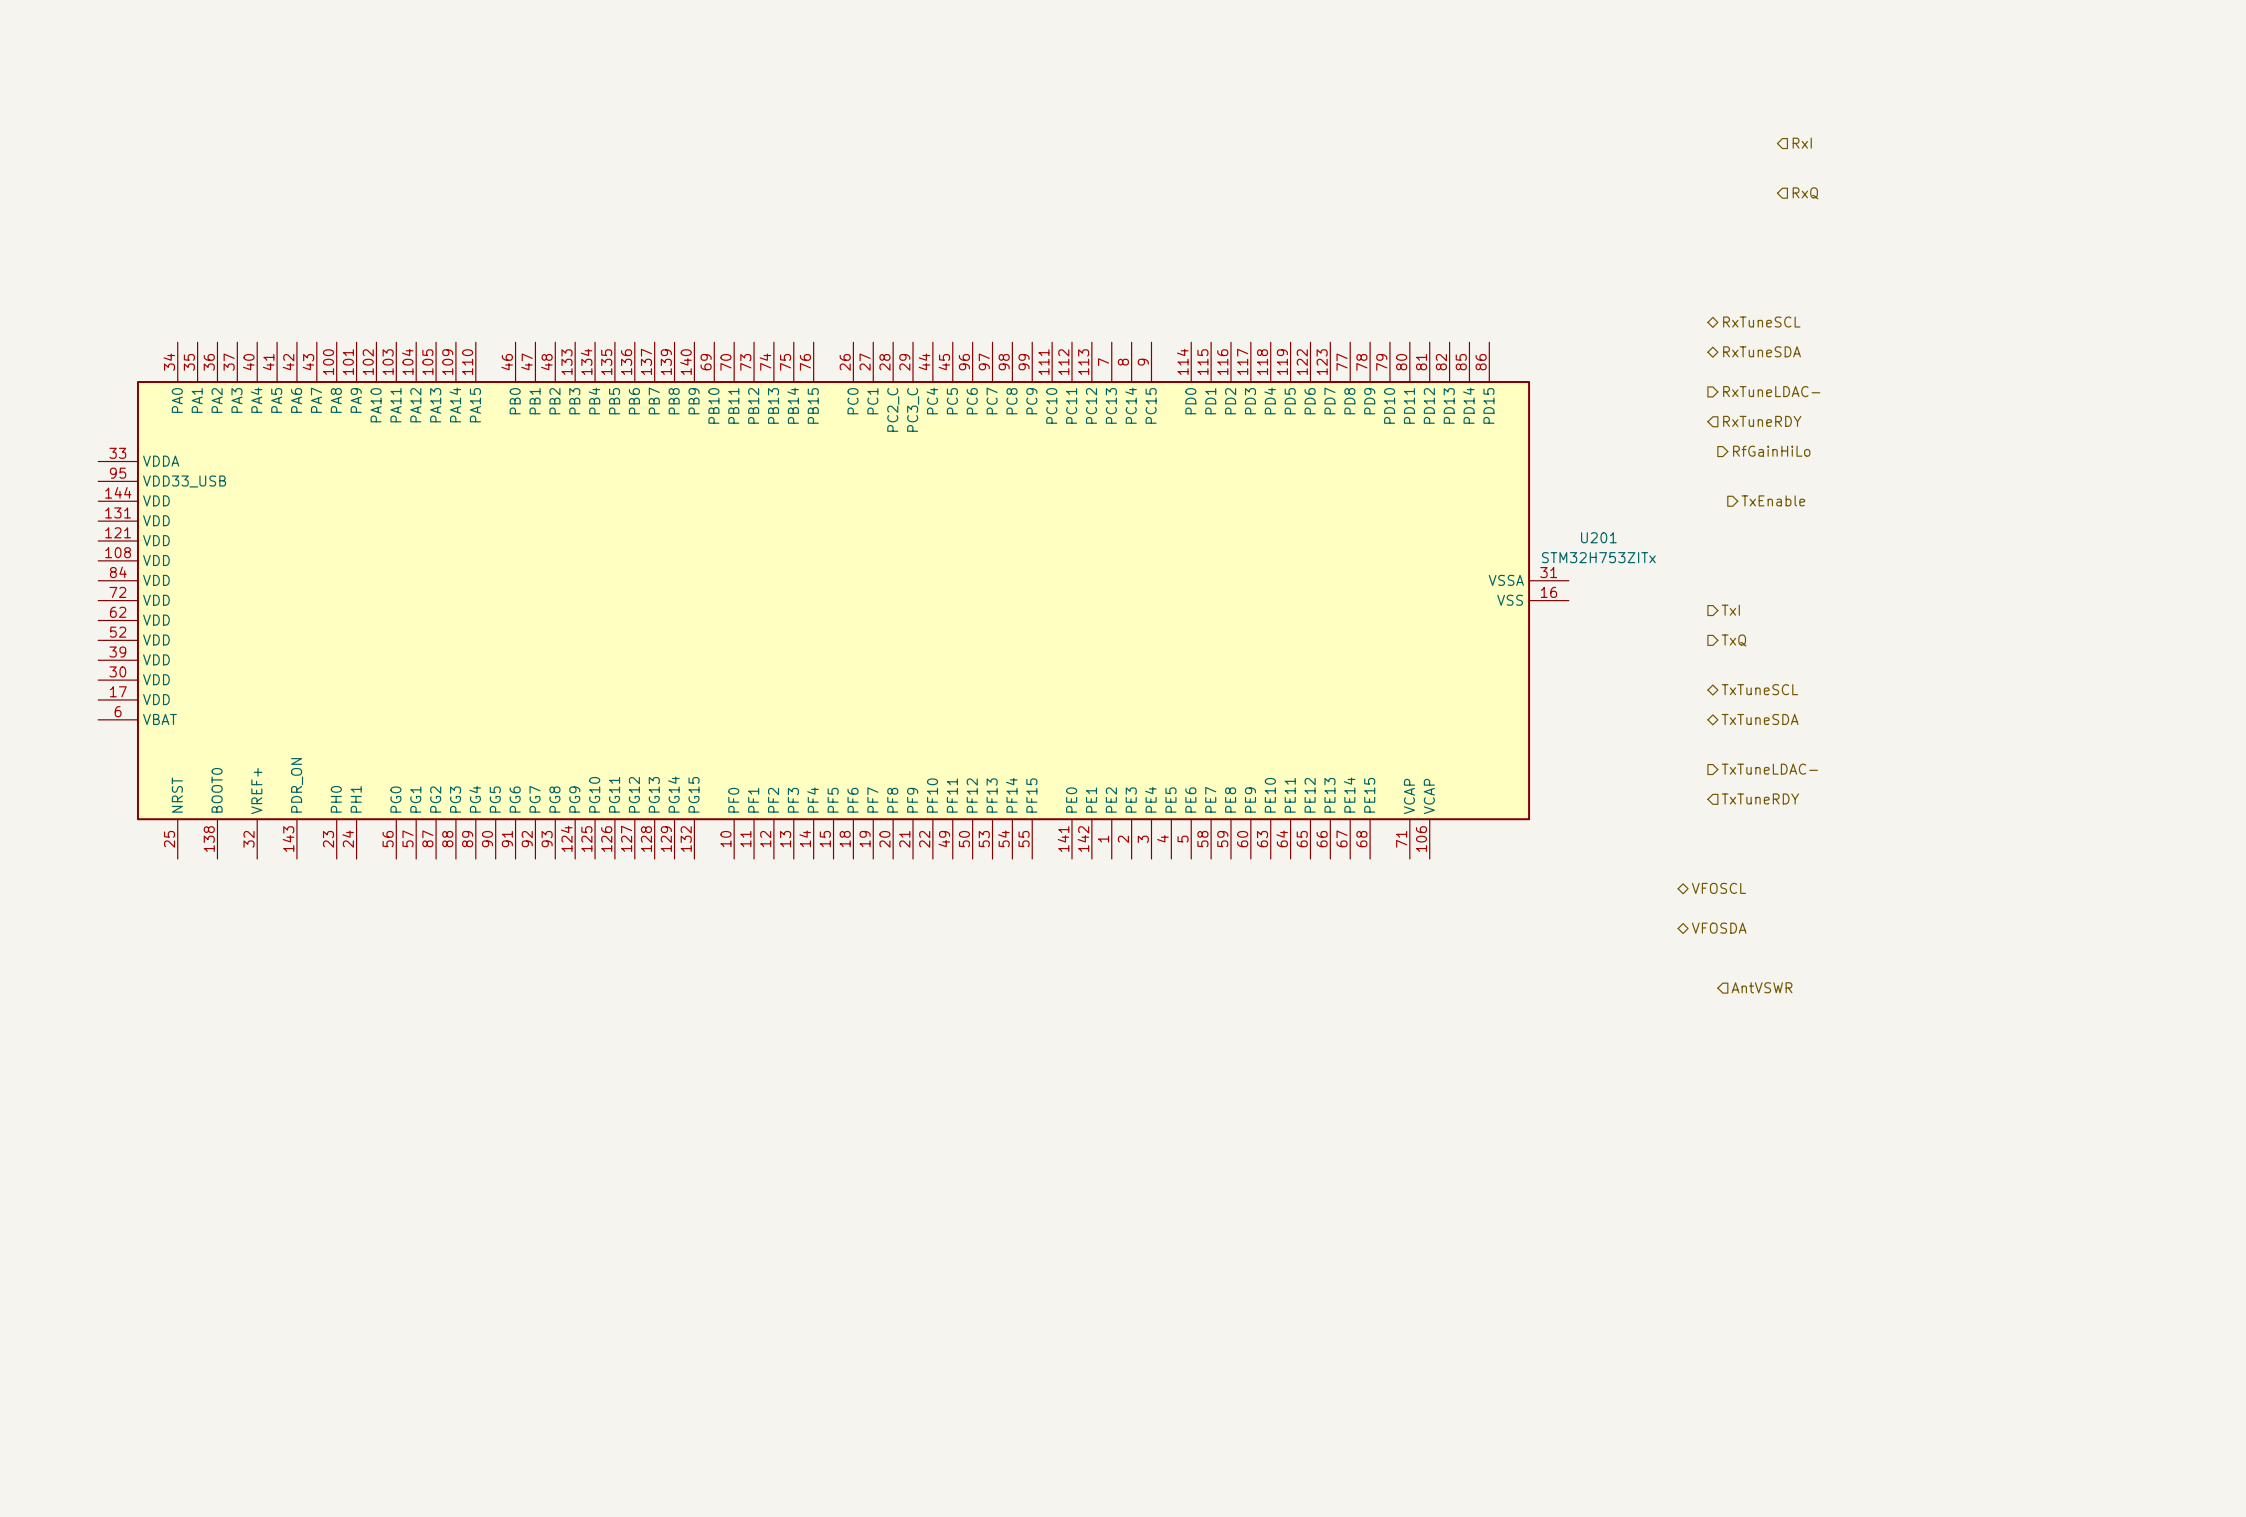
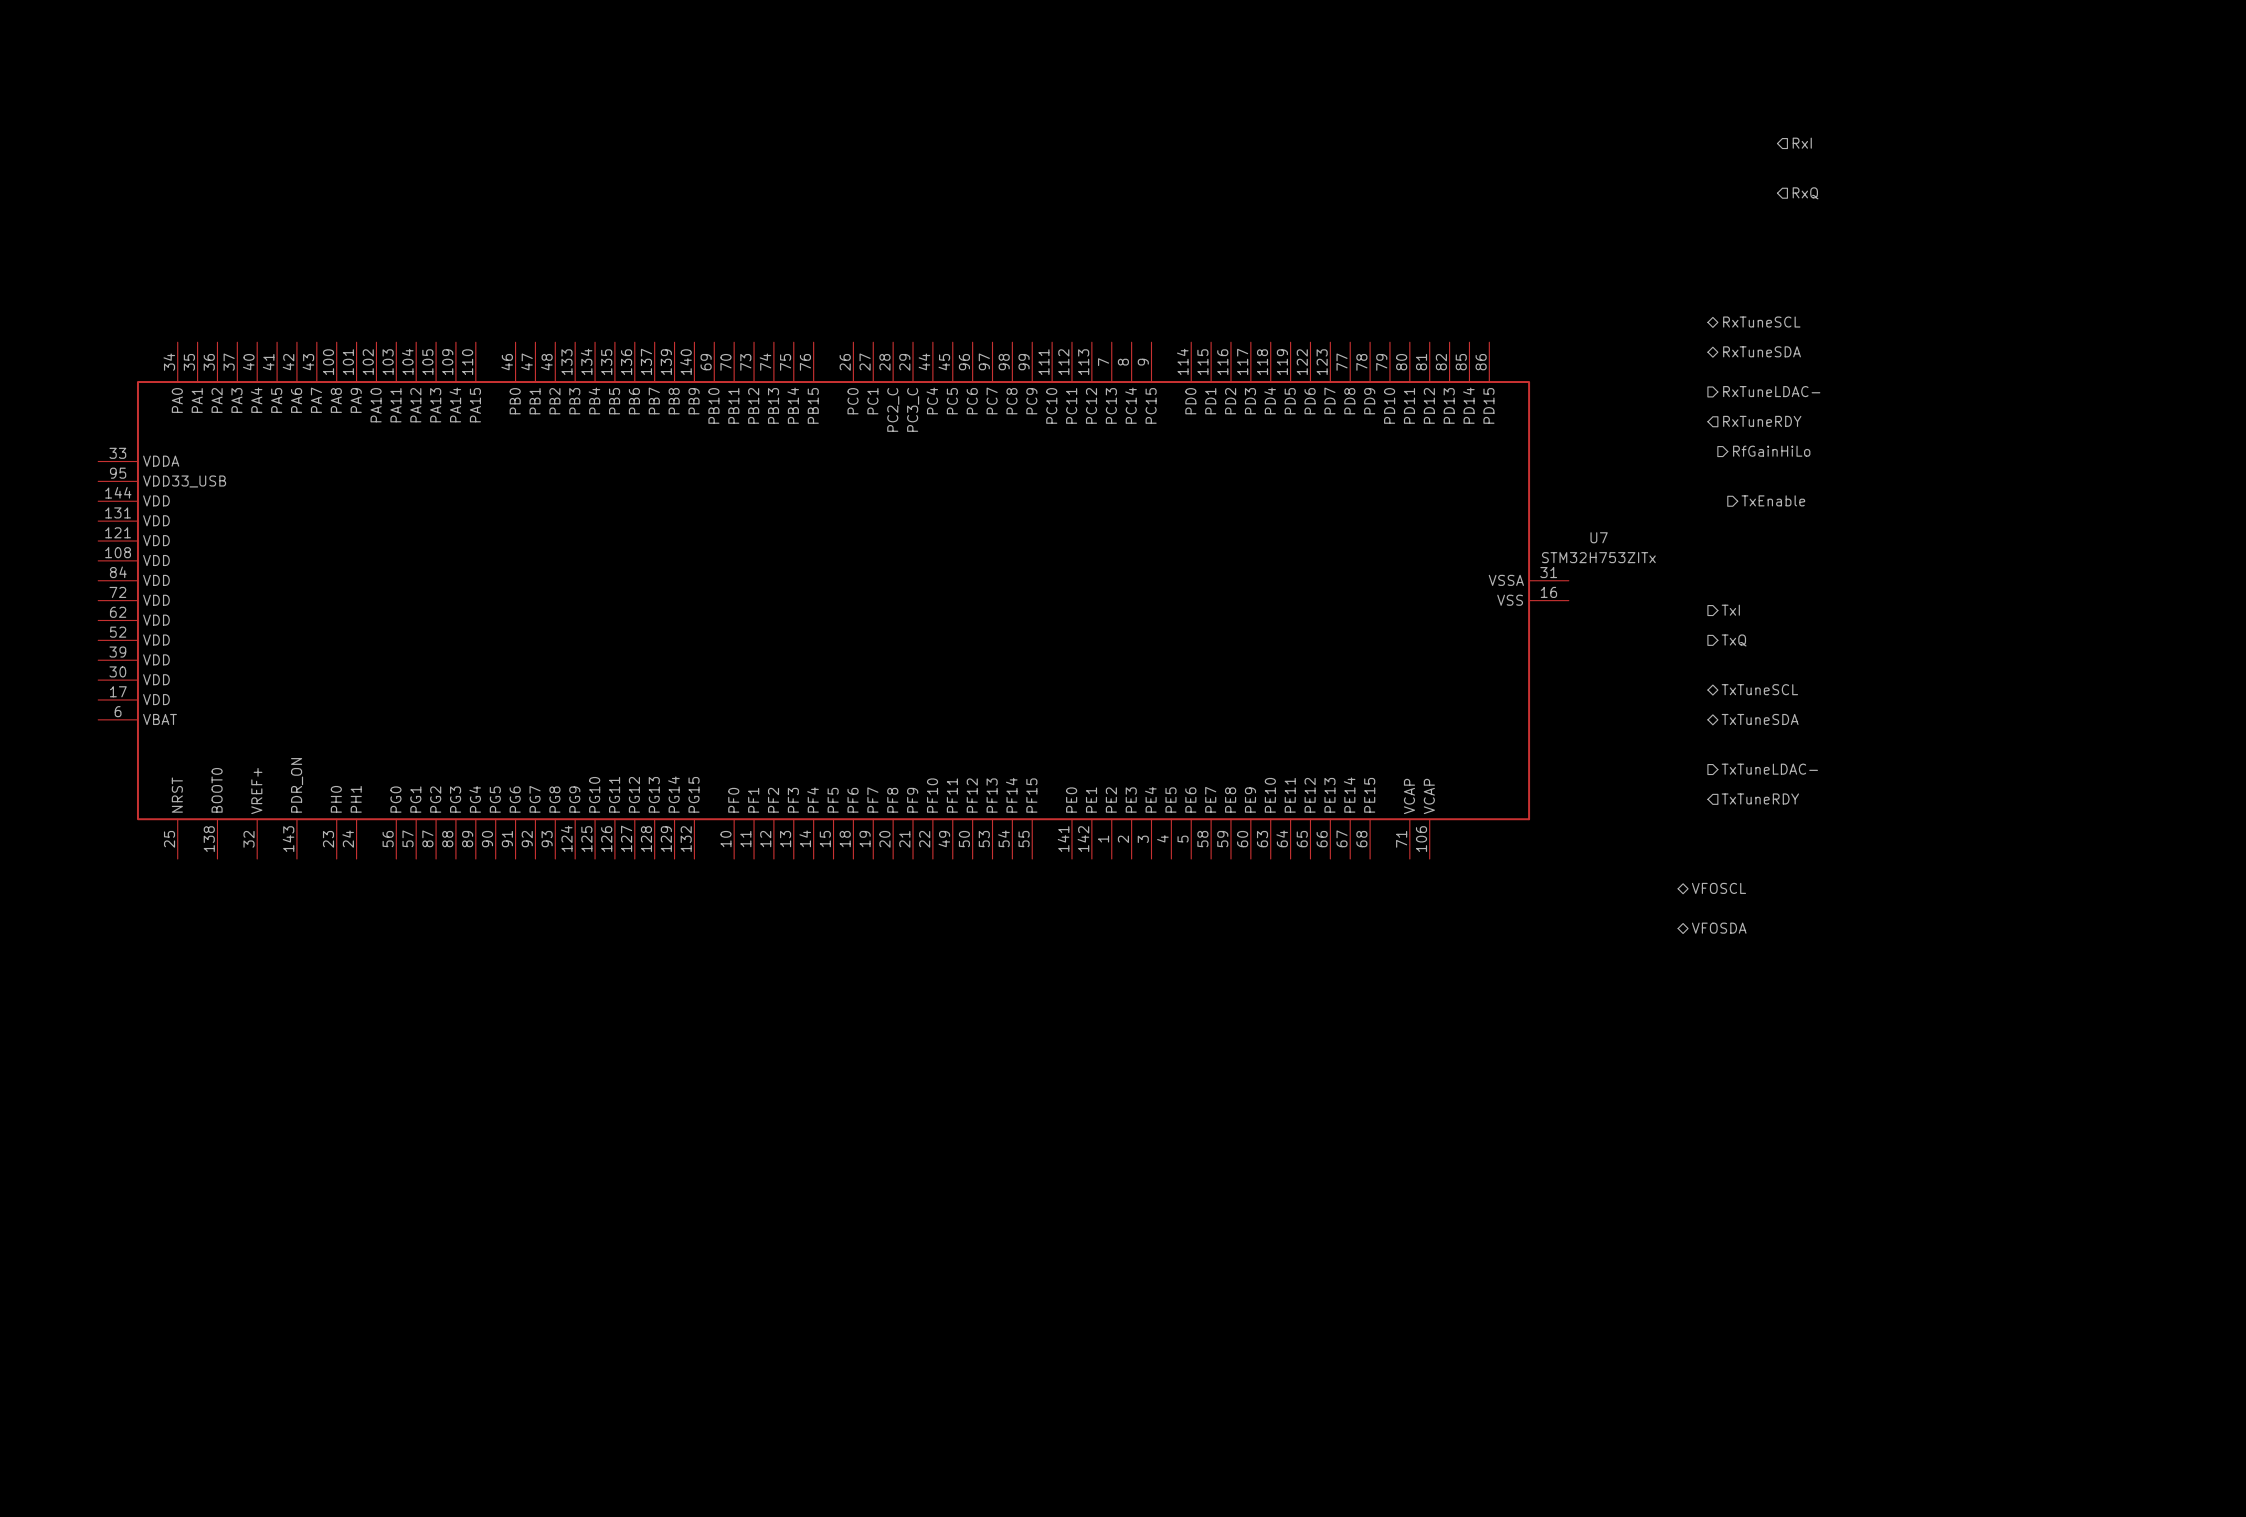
U201 name: U201 (1598, 537) -> U7 (1599, 537)
hierarchical label: AntVSWR (1762, 987) -> none

